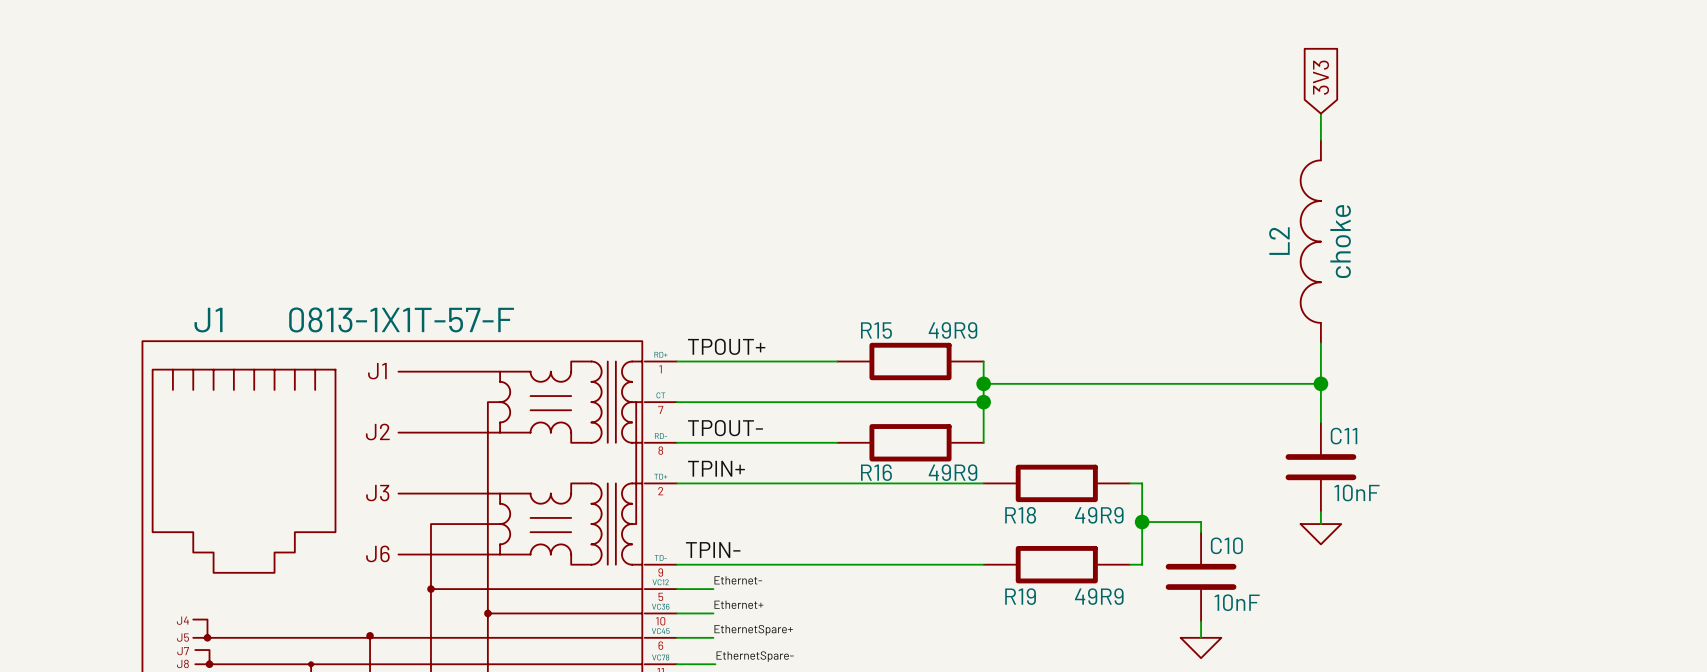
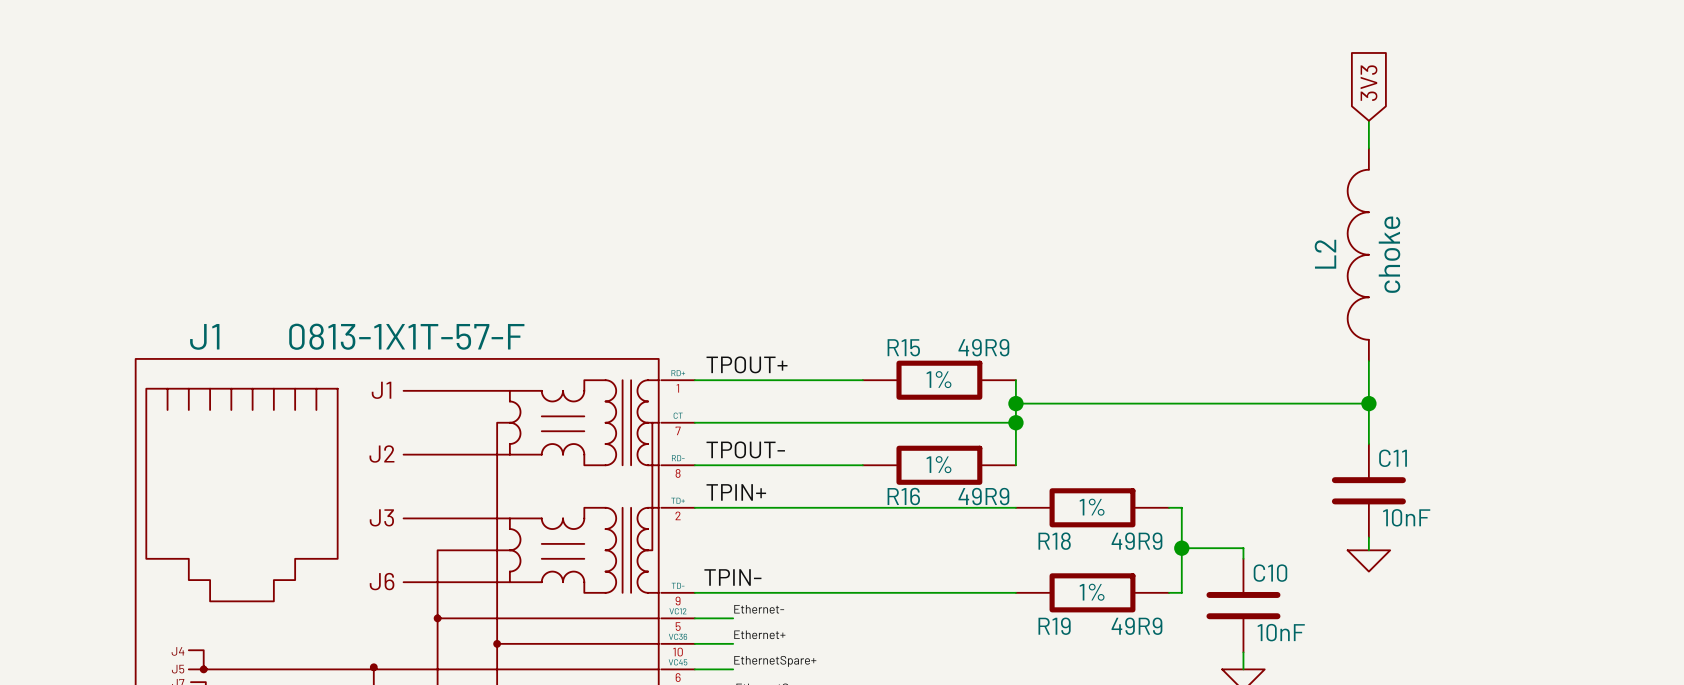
R15 text: none -> 1% (938, 379)
R16 text: none -> 1% (938, 464)
R18 text: none -> 1% (1092, 507)
R19 text: none -> 1% (1092, 592)

